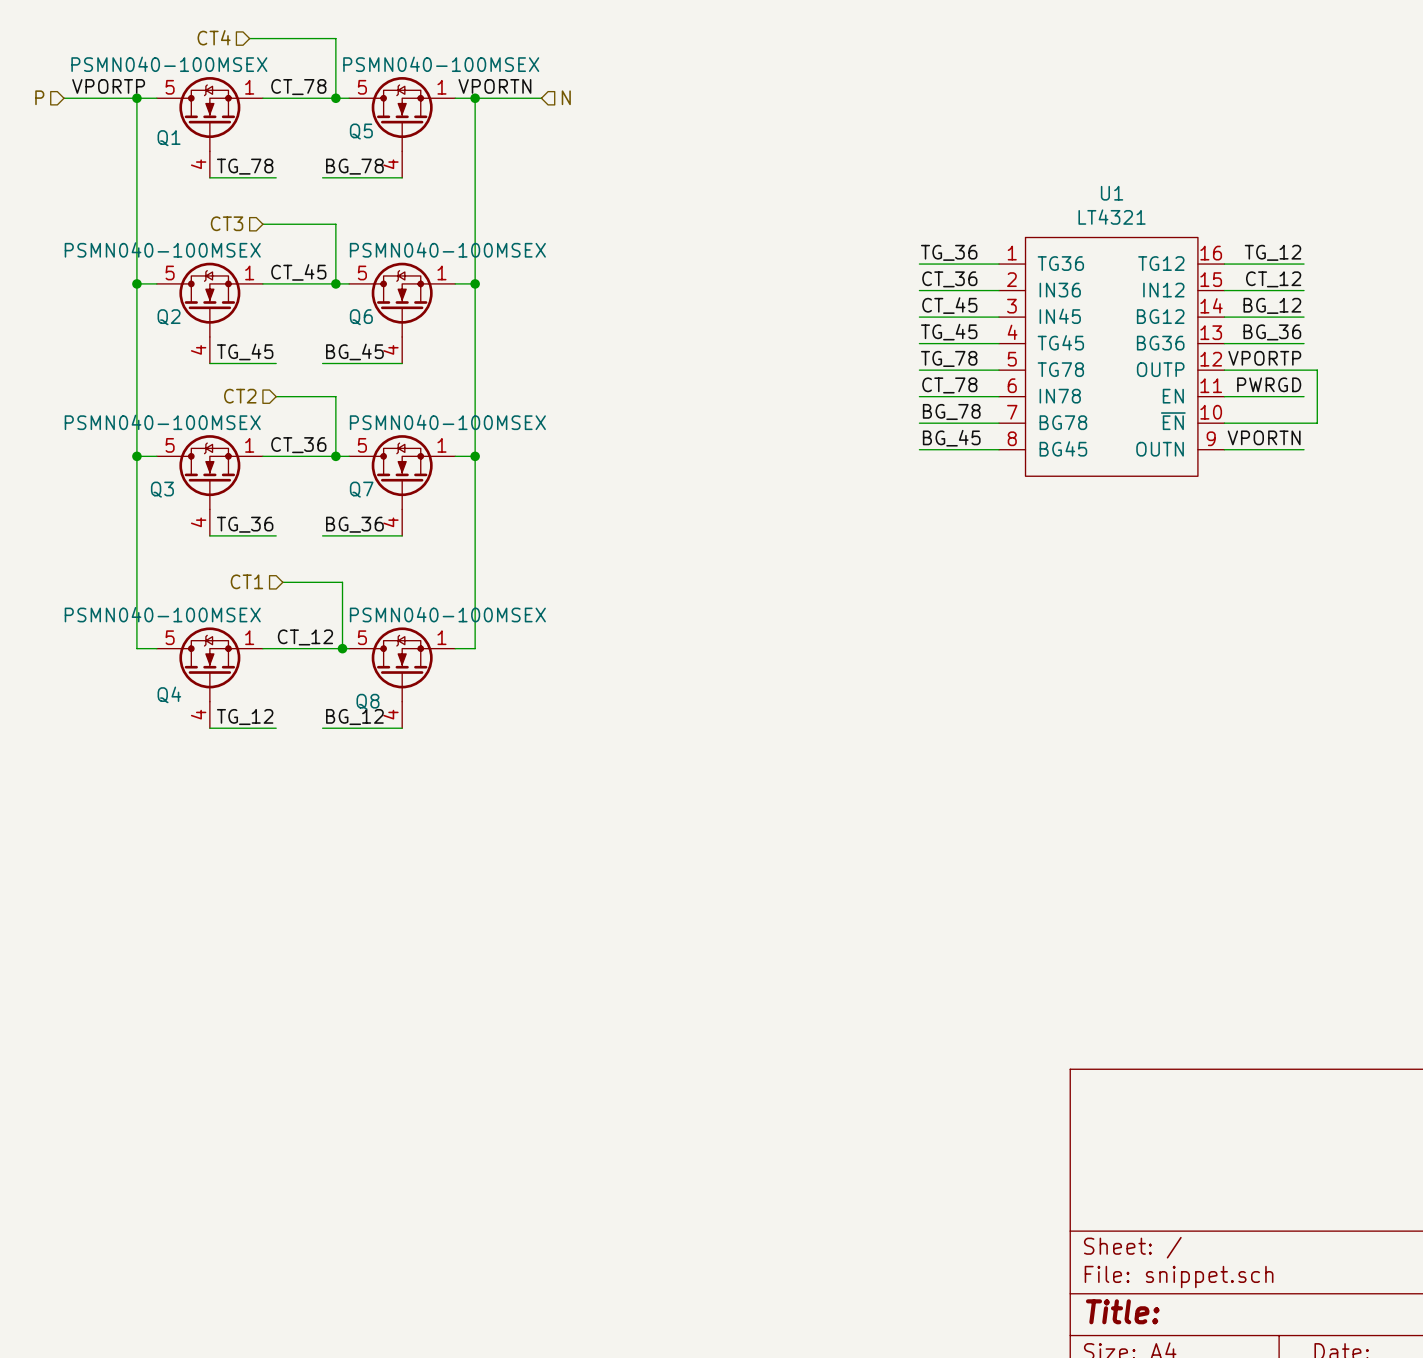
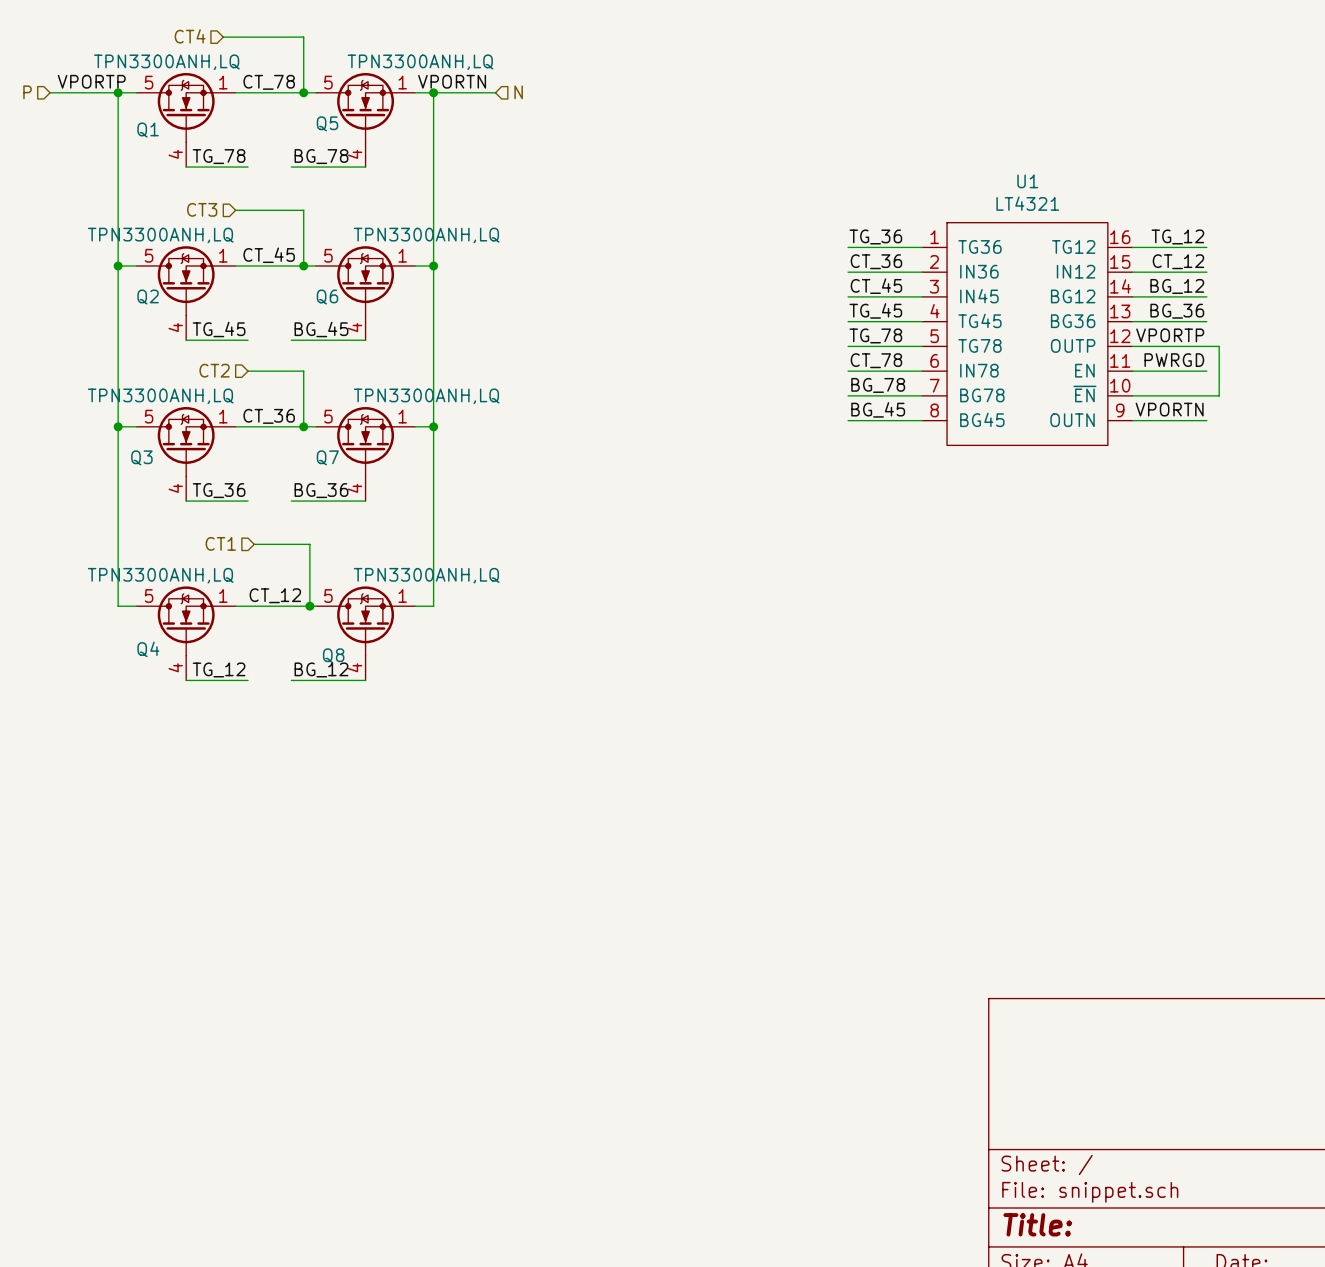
Q1 value: PSMN040-100MSEX (169, 64) -> TPN3300ANH,LQ (166, 62)
Q5 value: PSMN040-100MSEX (441, 64) -> TPN3300ANH,LQ (420, 62)
Q2 value: PSMN040-100MSEX (162, 249) -> TPN3300ANH,LQ (160, 235)
Q6 value: PSMN040-100MSEX (447, 249) -> TPN3300ANH,LQ (426, 235)
Q3 value: PSMN040-100MSEX (162, 422) -> TPN3300ANH,LQ (160, 396)
Q7 value: PSMN040-100MSEX (447, 422) -> TPN3300ANH,LQ (426, 396)
Q4 value: PSMN040-100MSEX (162, 614) -> TPN3300ANH,LQ (160, 575)
Q8 value: PSMN040-100MSEX (447, 614) -> TPN3300ANH,LQ (426, 575)

